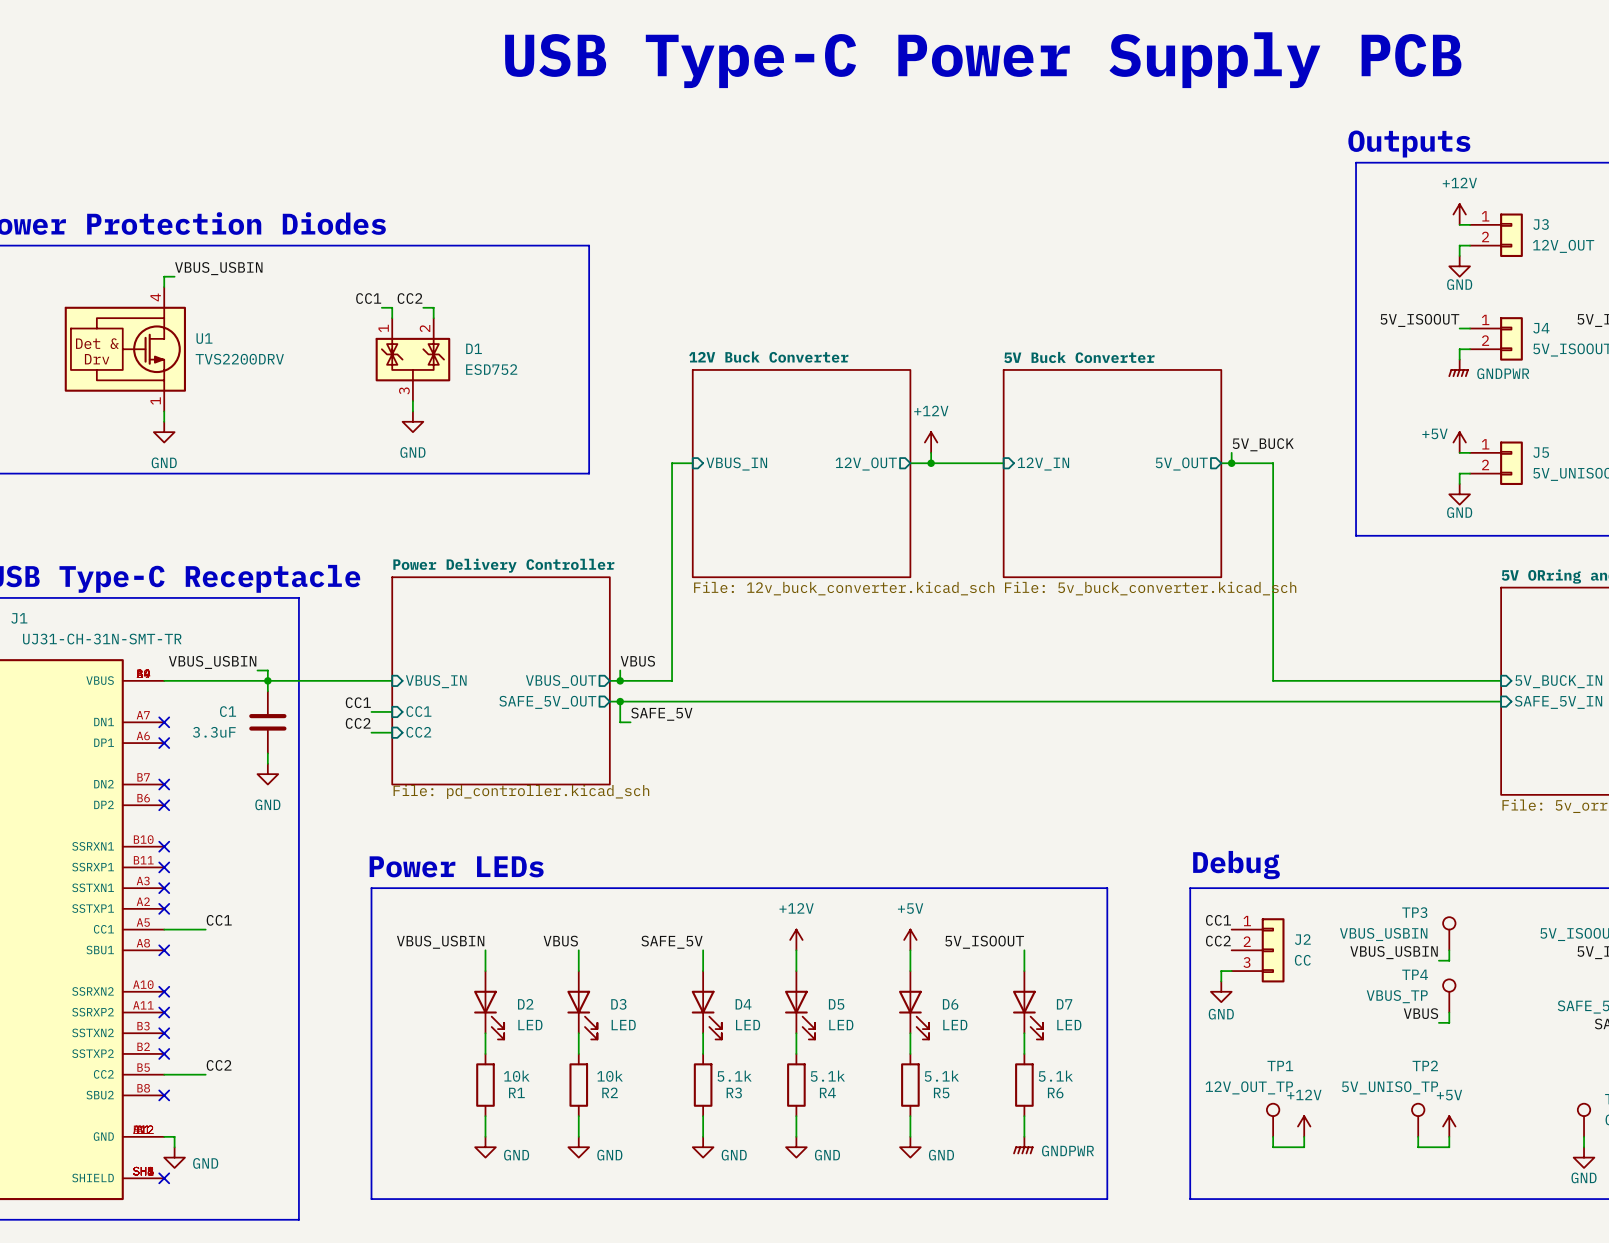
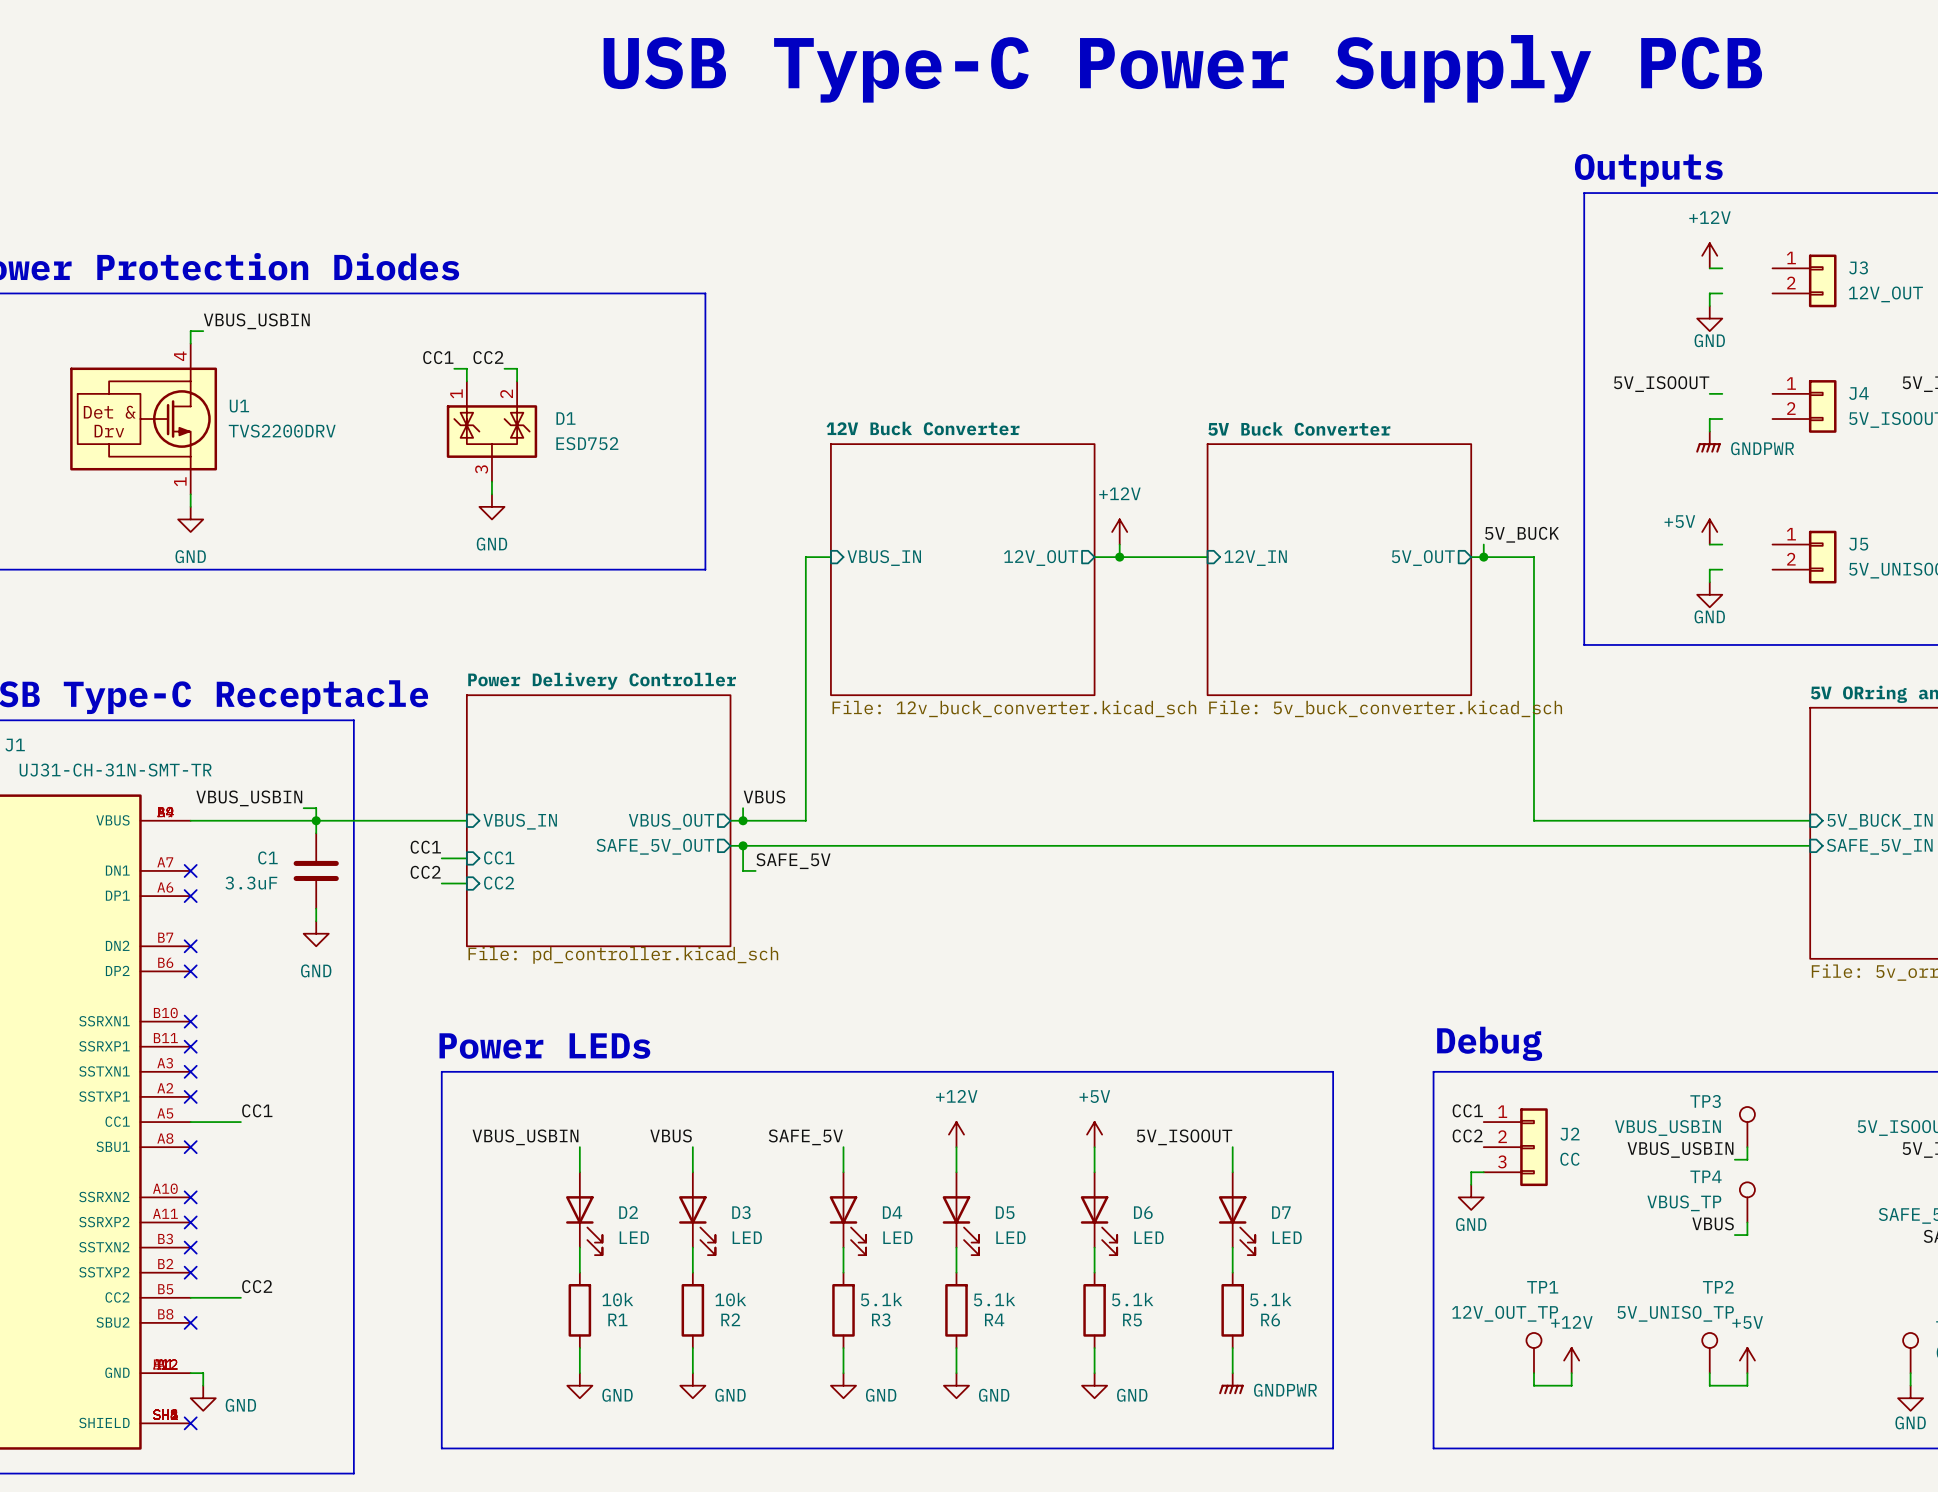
text position: Outputs (1409, 144) -> Outputs (1648, 170)
line: (1356, 162) (1356, 535) -> (1634, 193) (1584, 193) (1584, 644) (1634, 644)
power symbol position: +12V (1459, 214) -> +12V (1709, 255)
wire: (1459, 224) (1470, 224) -> (1709, 268) (1722, 268)
wire: (1470, 245) (1459, 245) (1459, 255) -> (1722, 293) (1709, 293) (1709, 306)
power symbol position: GND (1459, 266) -> GND (1709, 318)
label position: 5V_ISOOUT (1419, 320) -> 5V_ISOOUT (1661, 384)
wire: (1459, 328) (1470, 328) -> (1709, 393) (1722, 393)
wire: (1470, 349) (1459, 349) (1459, 359) -> (1722, 419) (1709, 419) (1709, 431)
power symbol position: GNDPWR (1458, 368) -> GNDPWR (1708, 442)
power symbol position: +5V (1459, 442) -> +5V (1709, 531)
wire: (1459, 452) (1470, 452) -> (1709, 544) (1722, 544)
wire: (1470, 473) (1459, 473) (1459, 483) -> (1722, 569) (1709, 569) (1709, 582)
power symbol position: GND (1459, 494) -> GND (1709, 594)

